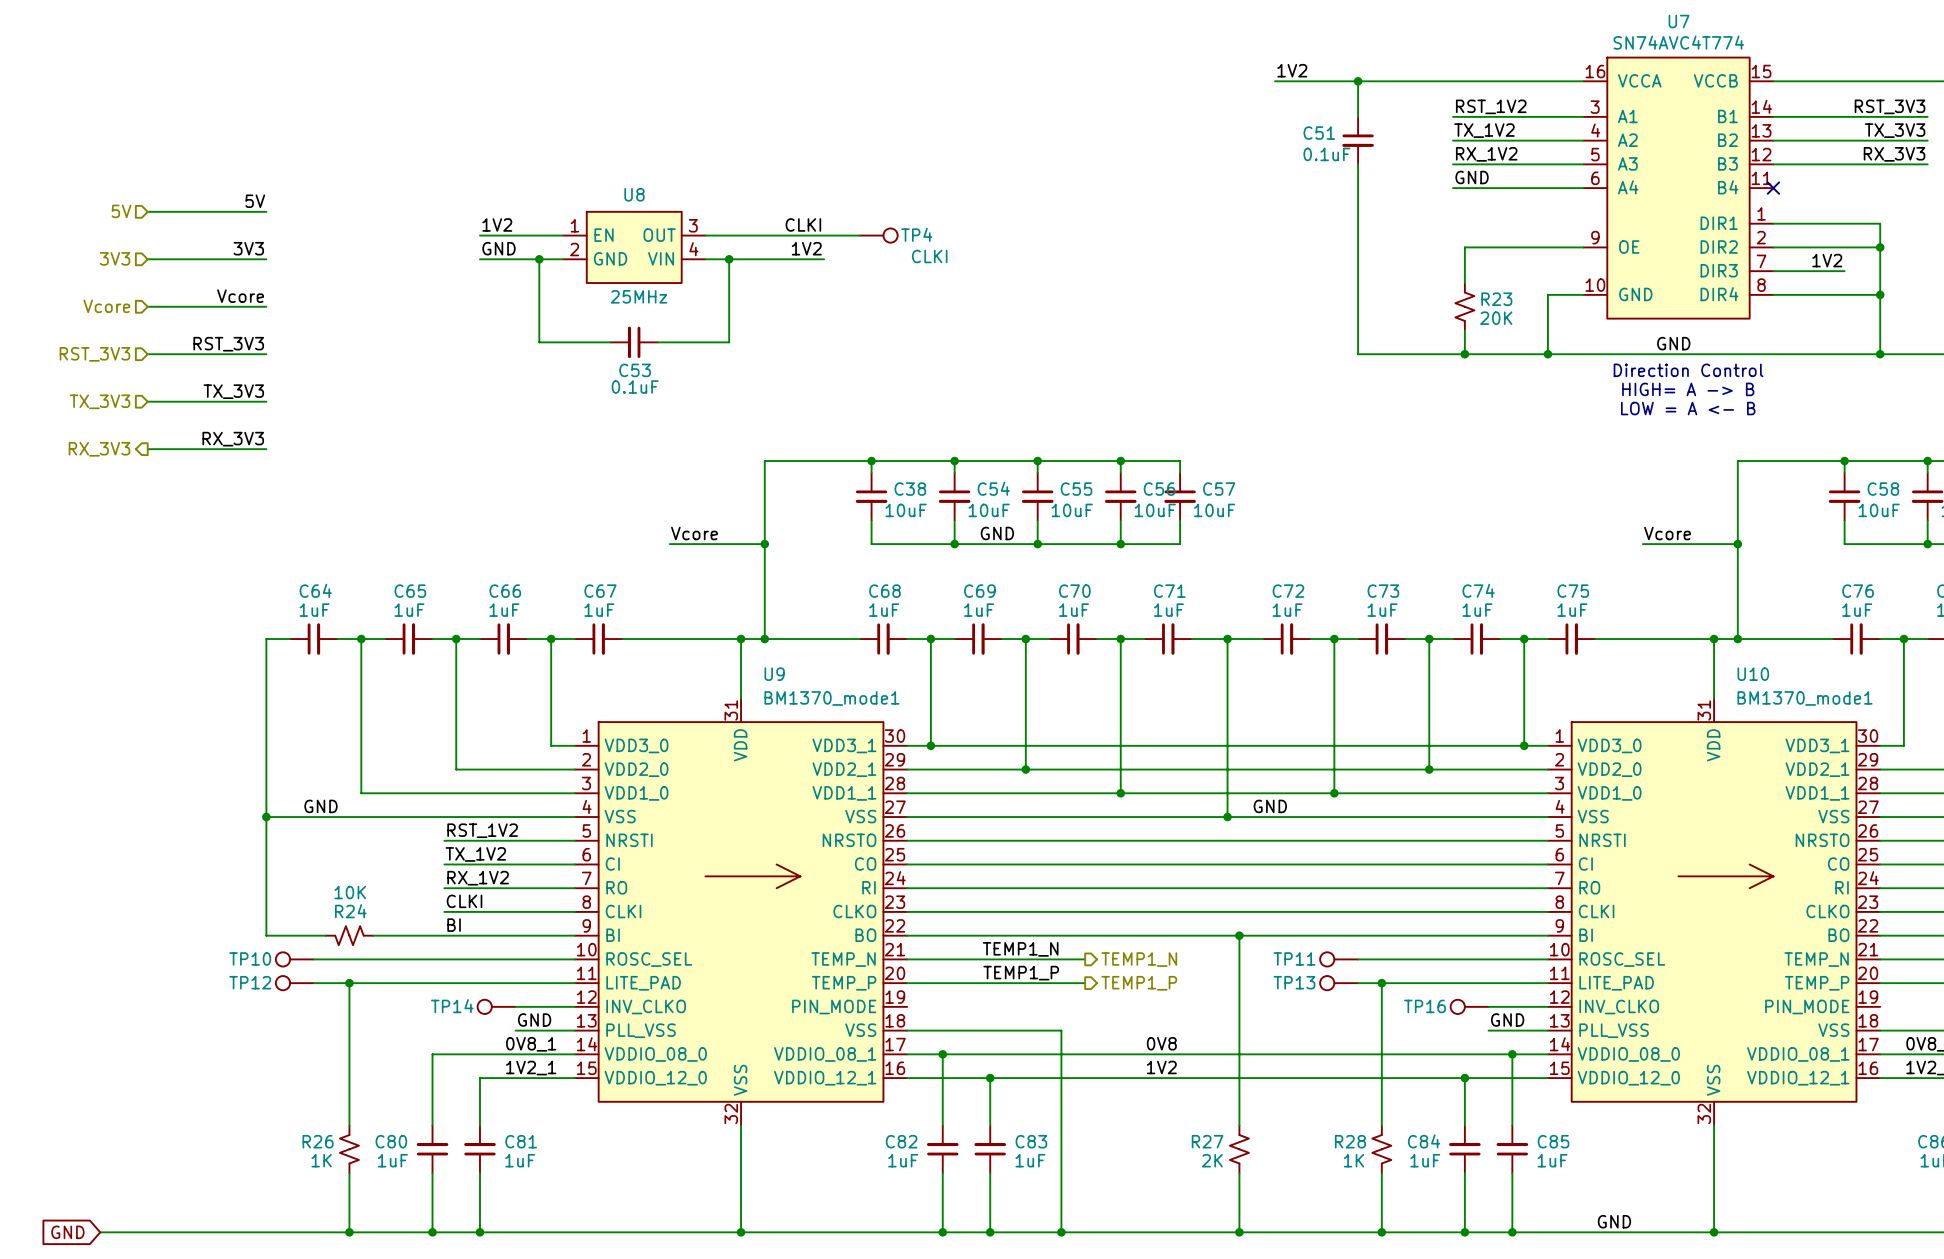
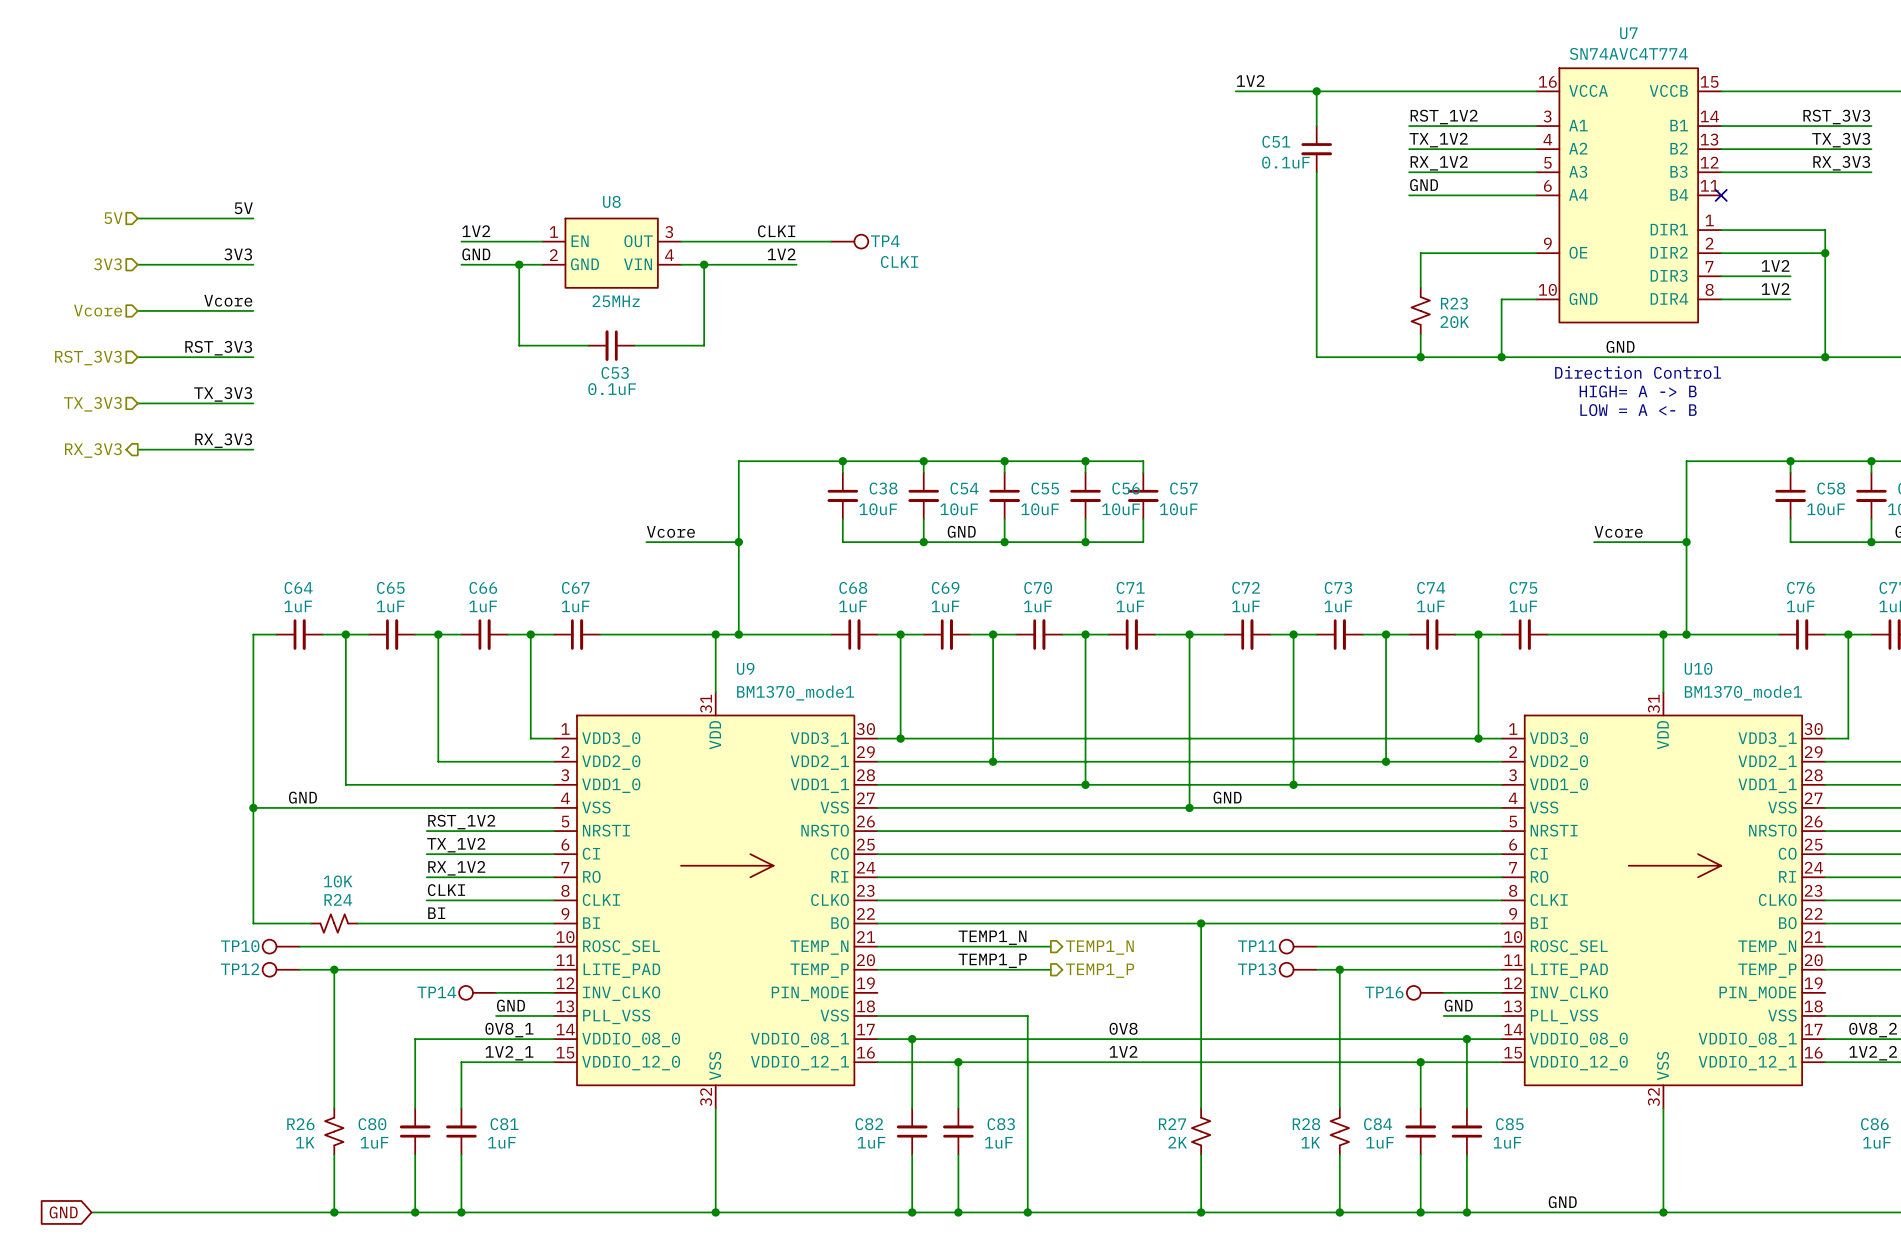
label: none -> 1V2 (1775, 288)
wire: (1844, 294) (1880, 294) -> none
junction: (1880, 294) -> none

